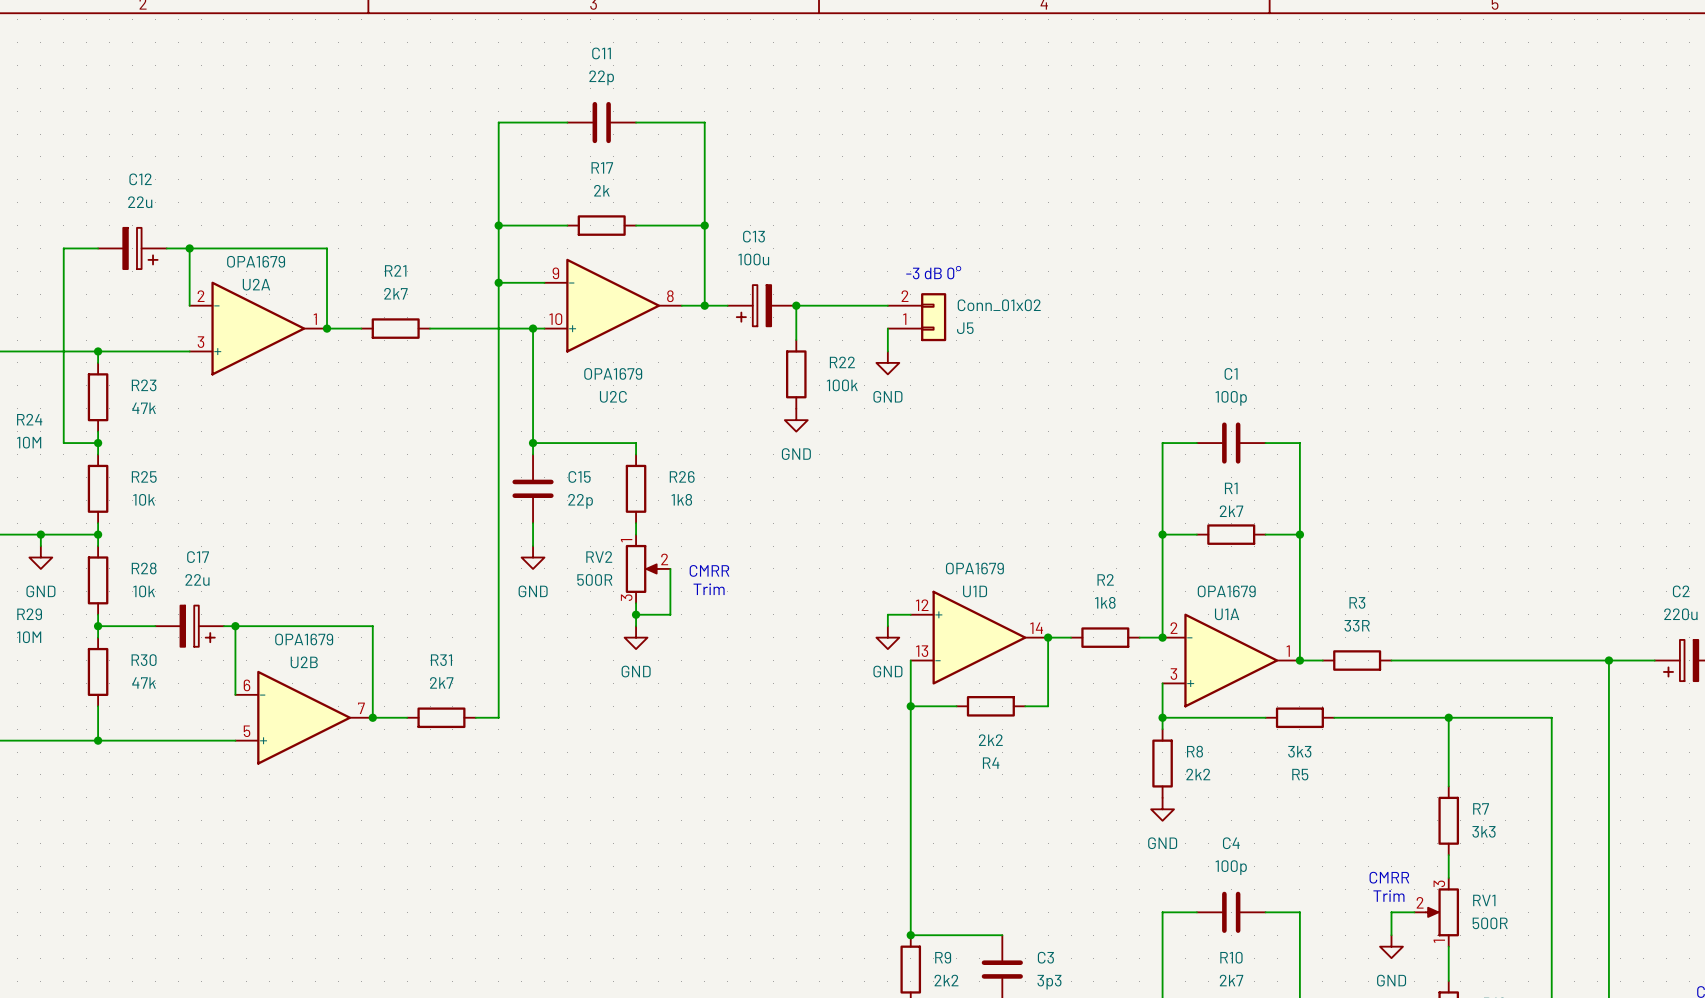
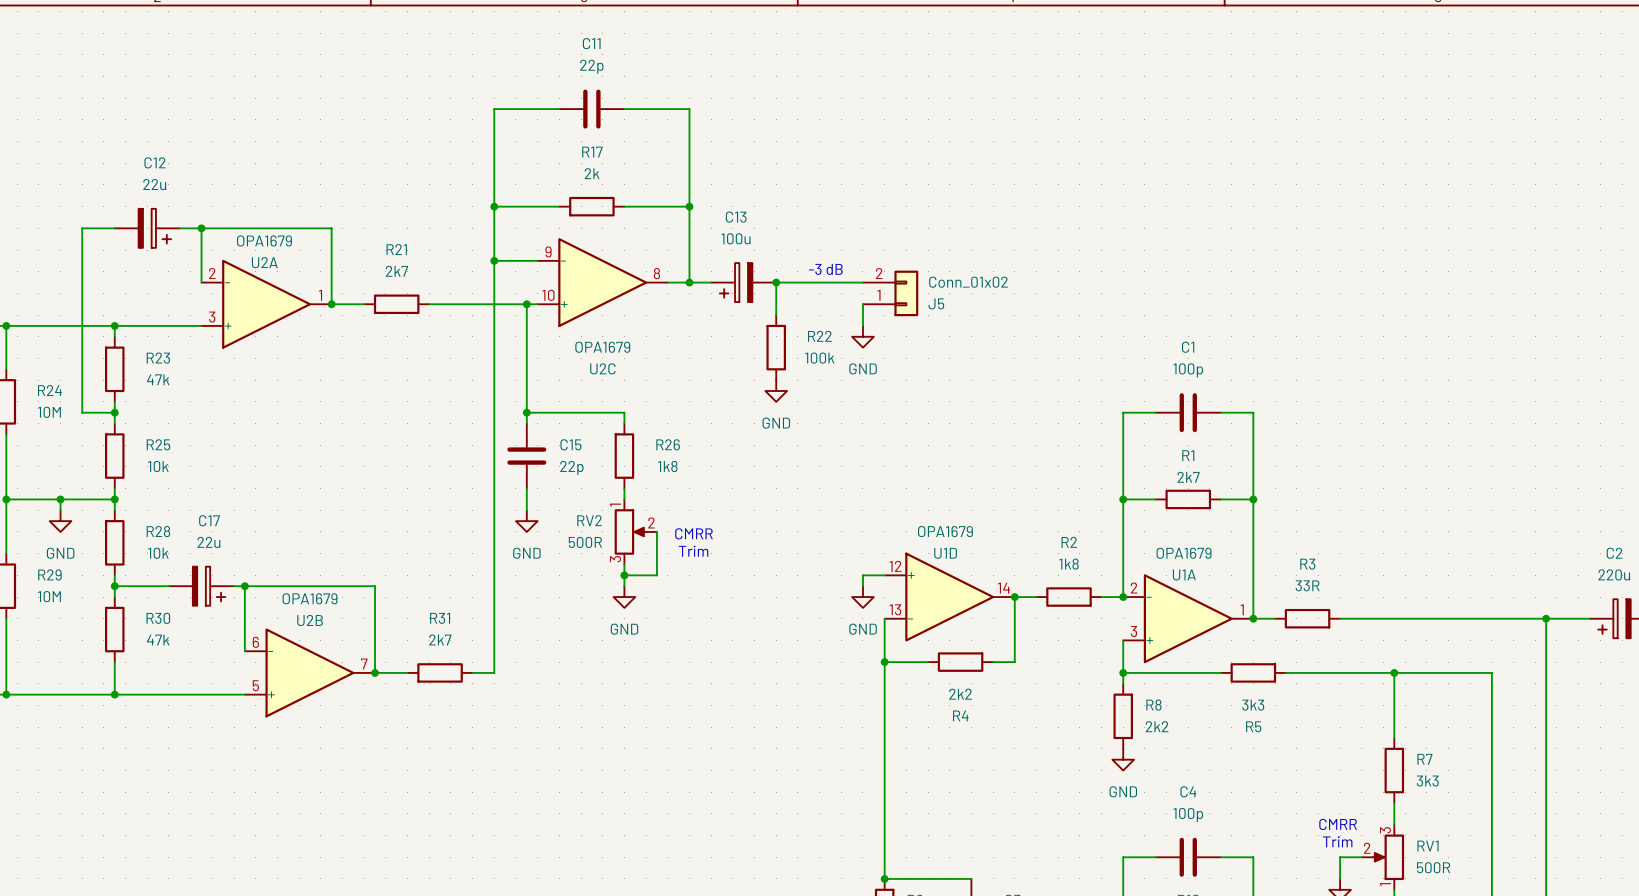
text: -3 dB 0° (933, 272) -> none
text: none -> -3 dB (825, 269)

